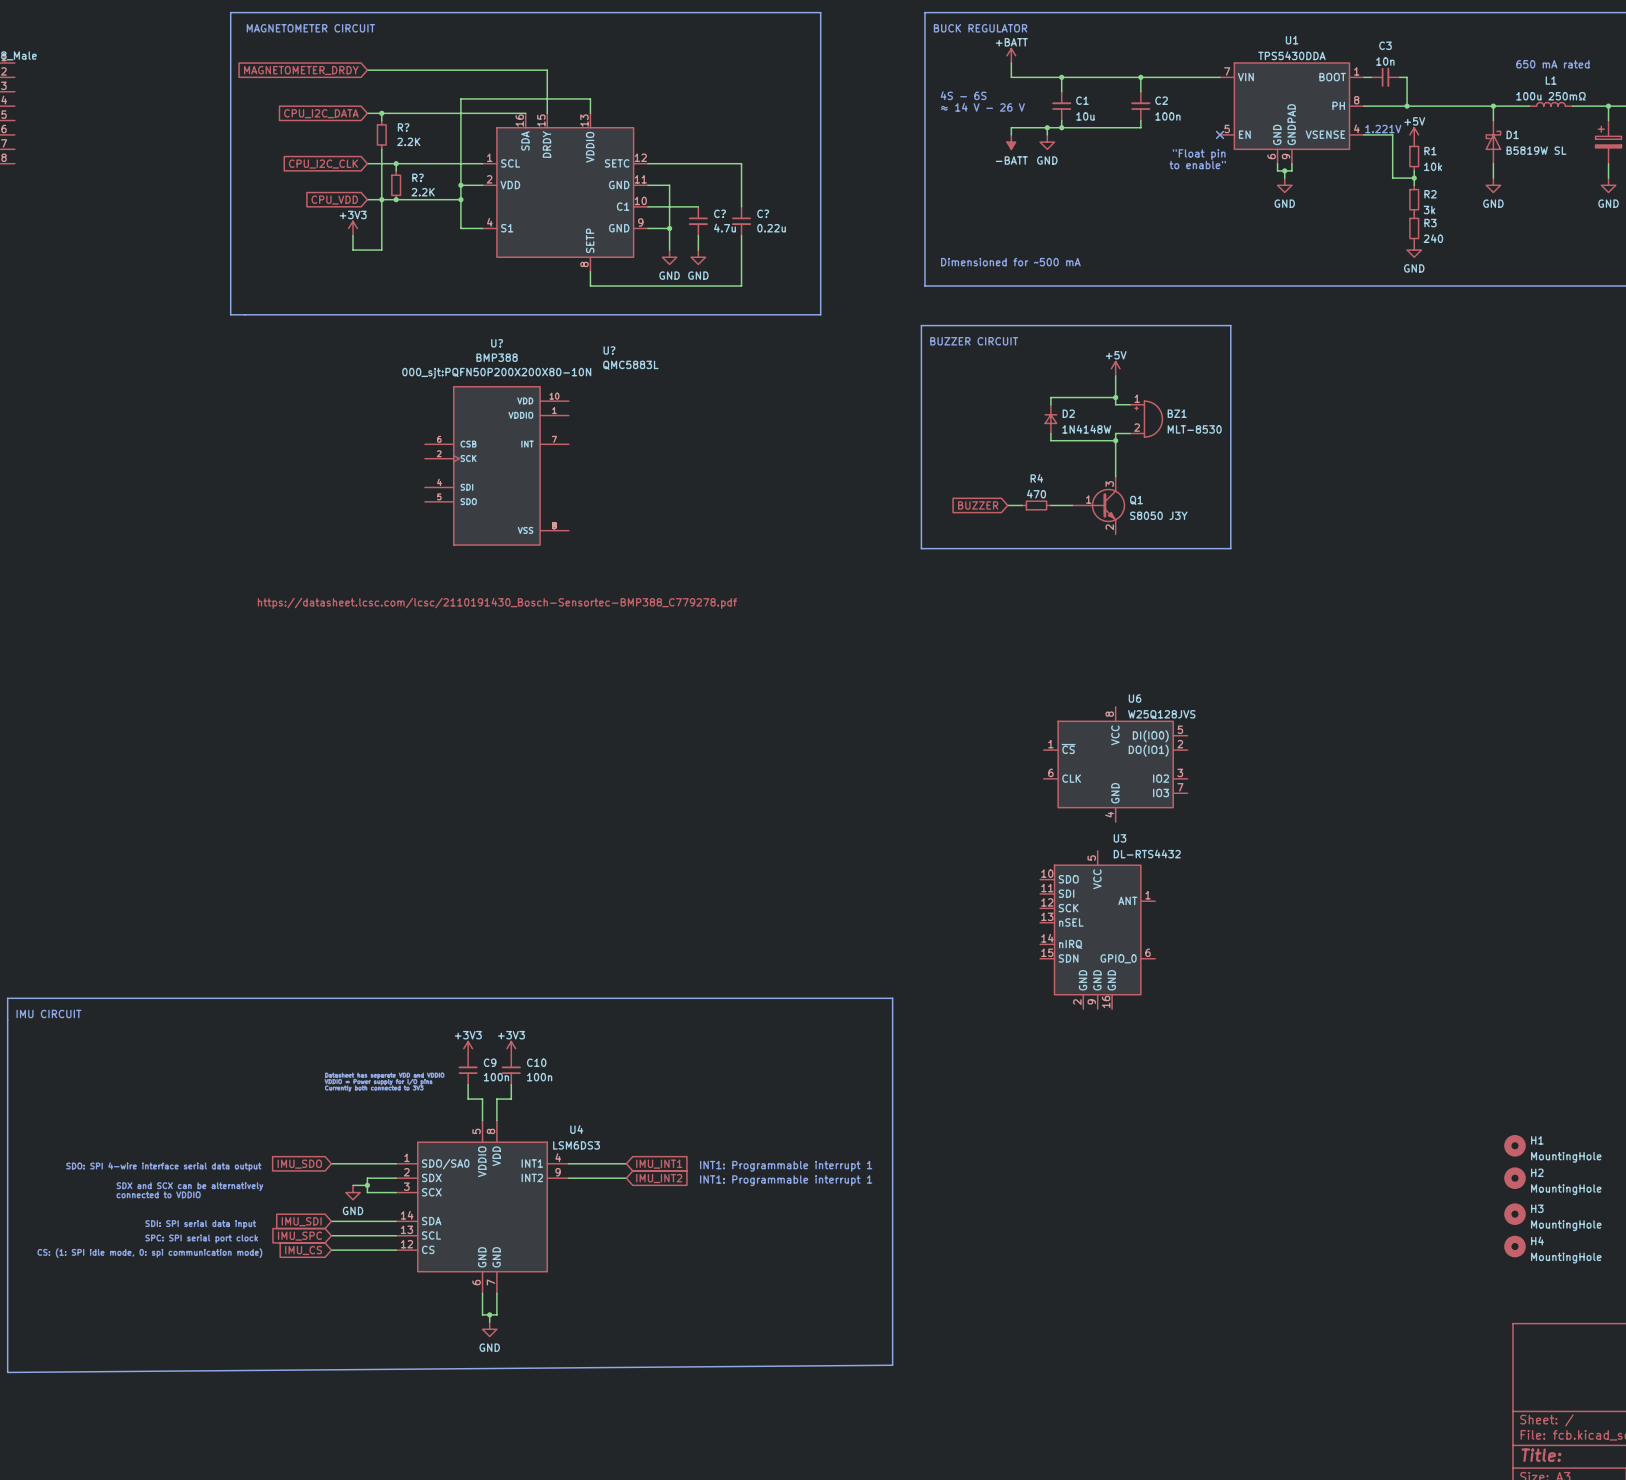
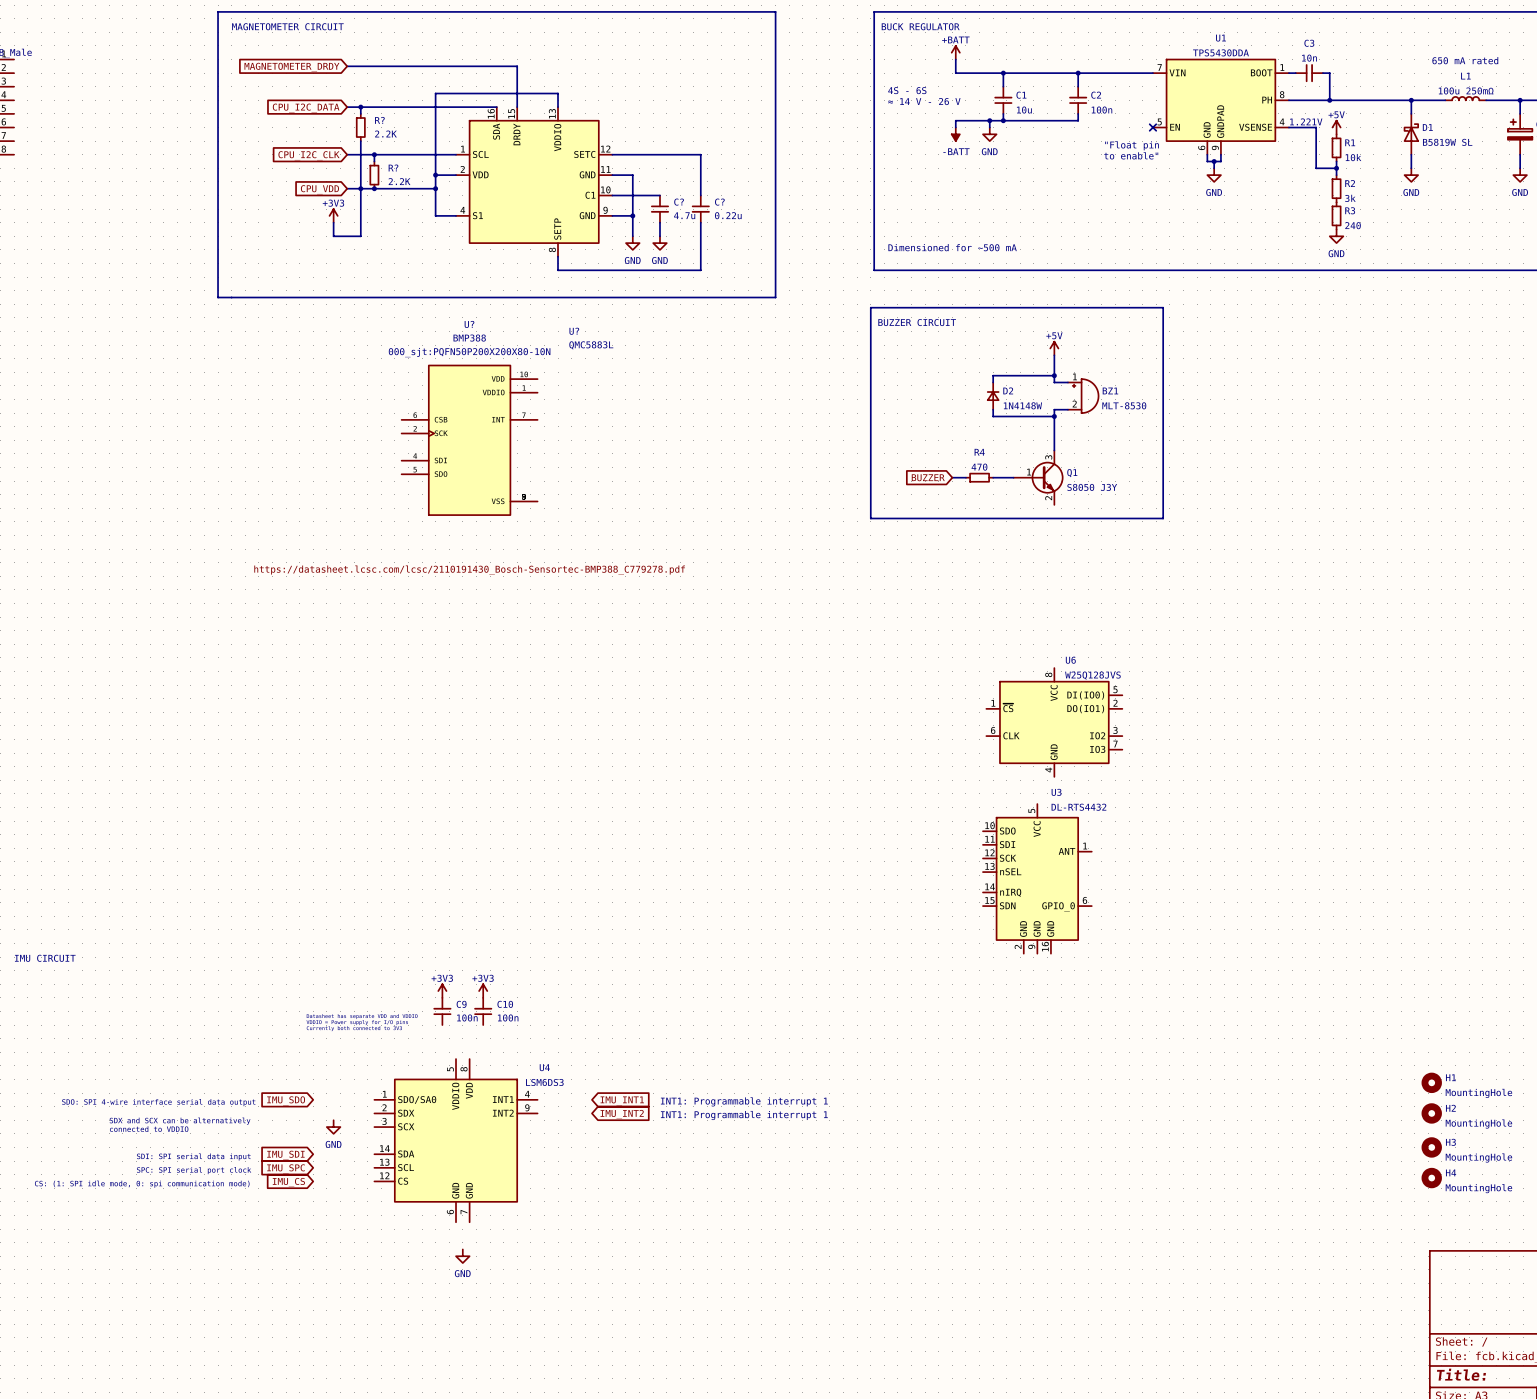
line: (7, 998) (7, 1372) (892, 1365) (892, 998) (7, 998) -> none
wire: (468, 1084) (468, 1099) (482, 1099) (482, 1120) -> none
wire: (511, 1084) (511, 1099) (496, 1099) (496, 1120) -> none
wire: (331, 1163) (396, 1163) -> none
wire: (568, 1163) (626, 1163) -> none
wire: (396, 1178) (367, 1178) (367, 1192) (396, 1192) -> none
wire: (568, 1178) (626, 1178) -> none
wire: (353, 1185) (367, 1185) -> none
junction: (367, 1185) -> none
wire: (331, 1221) (396, 1221) -> none
wire: (331, 1235) (396, 1235) -> none
wire: (331, 1250) (396, 1250) -> none
wire: (482, 1293) (482, 1314) (496, 1314) (496, 1293) -> none
wire: (489, 1314) (489, 1322) -> none
junction: (489, 1314) -> none

